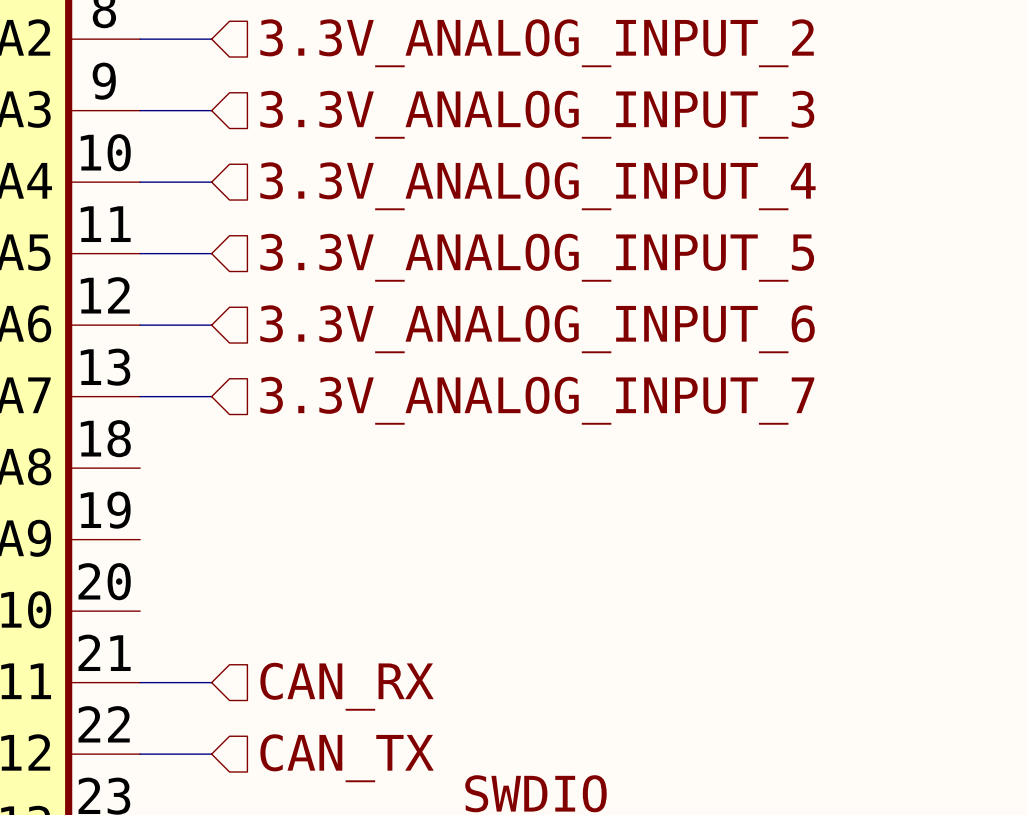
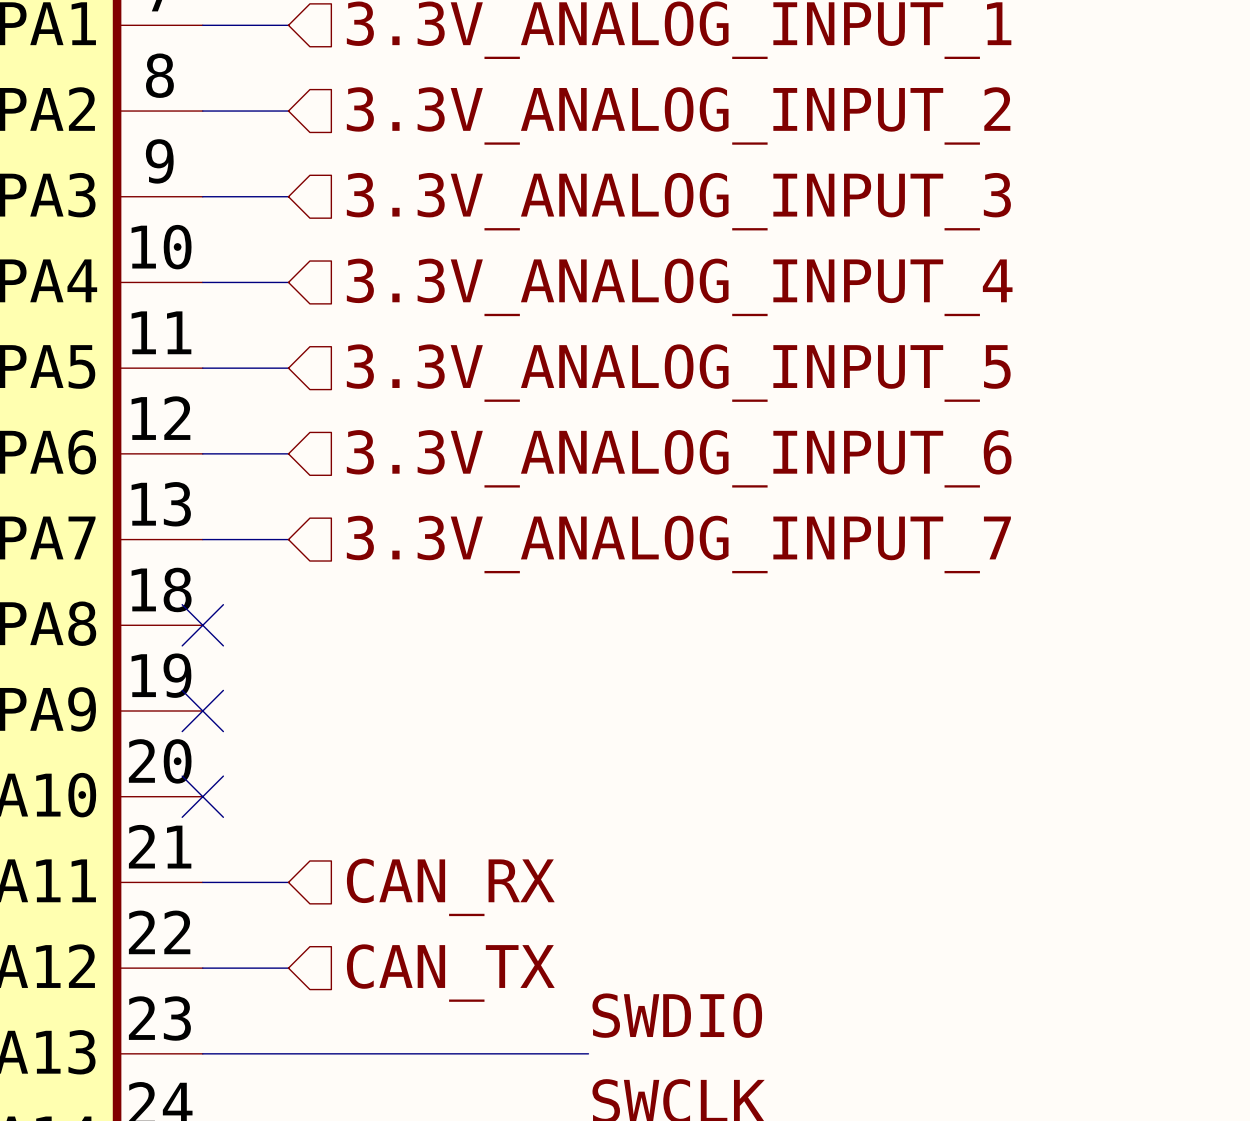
no-connect mark: none -> (202, 625)
no-connect mark: none -> (202, 711)
no-connect mark: none -> (202, 796)

